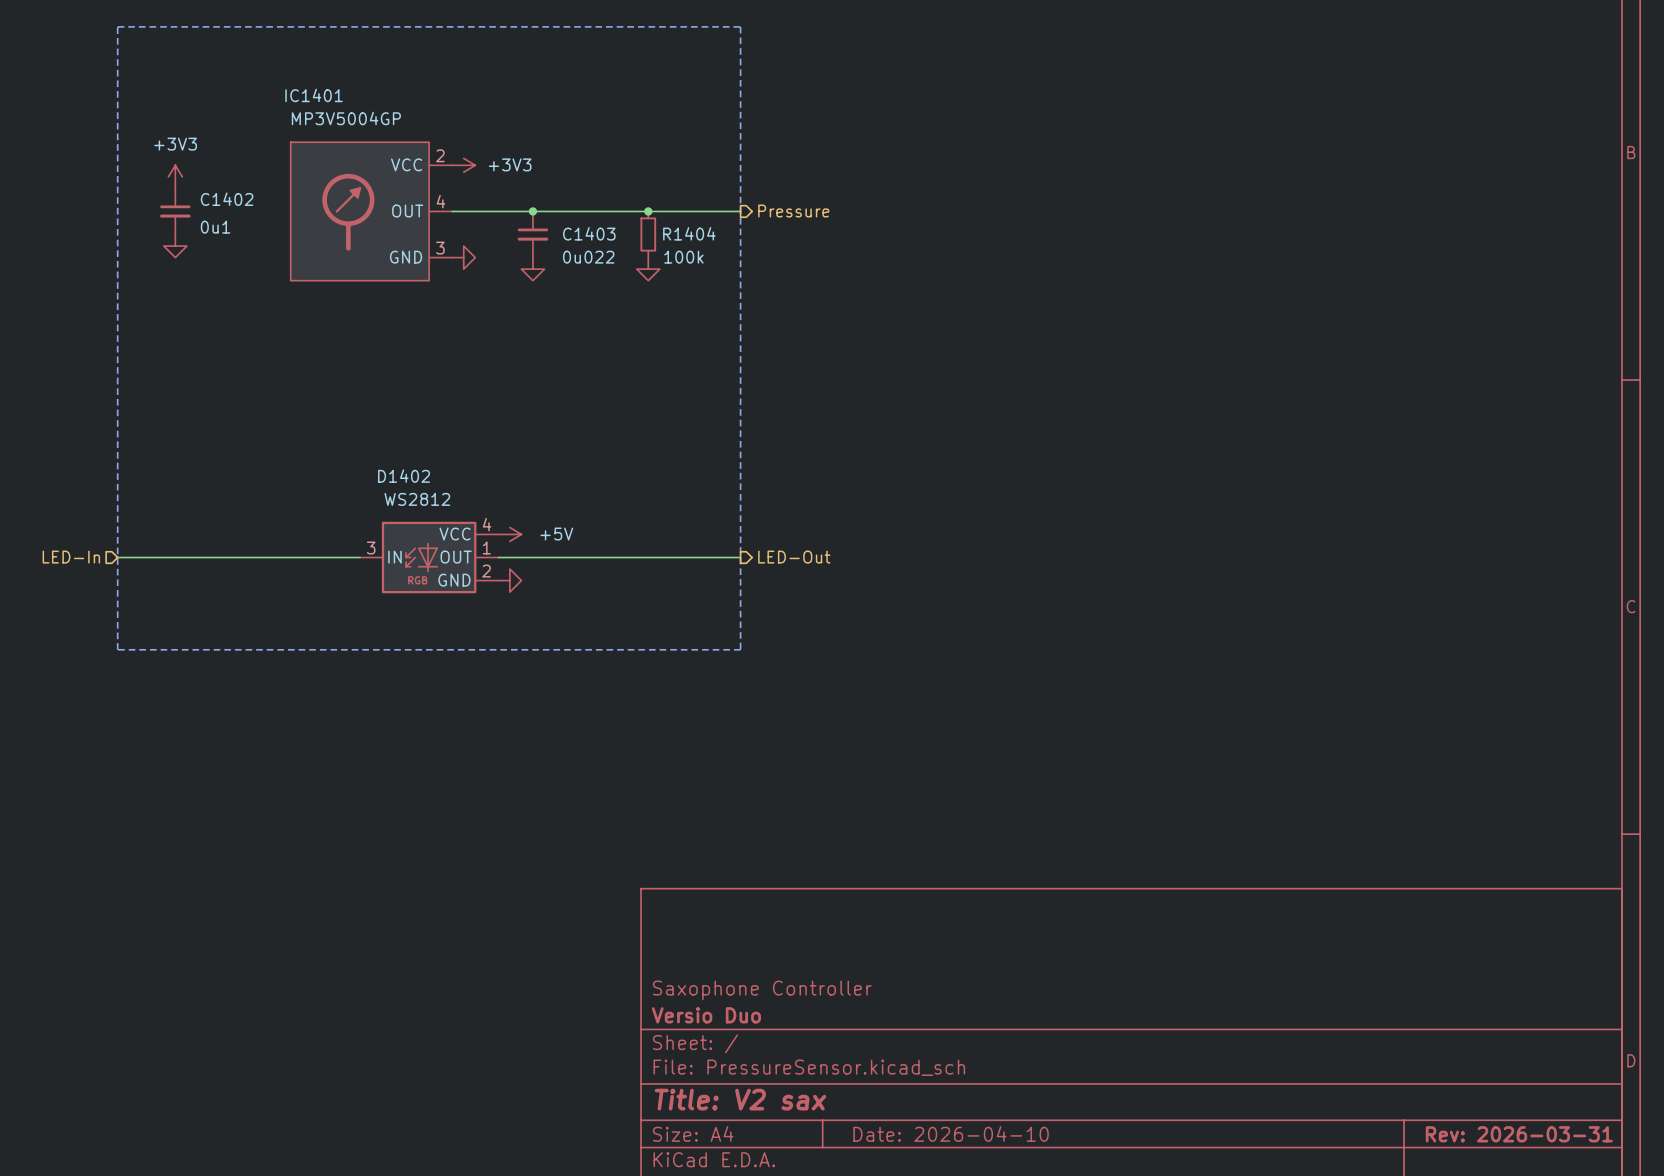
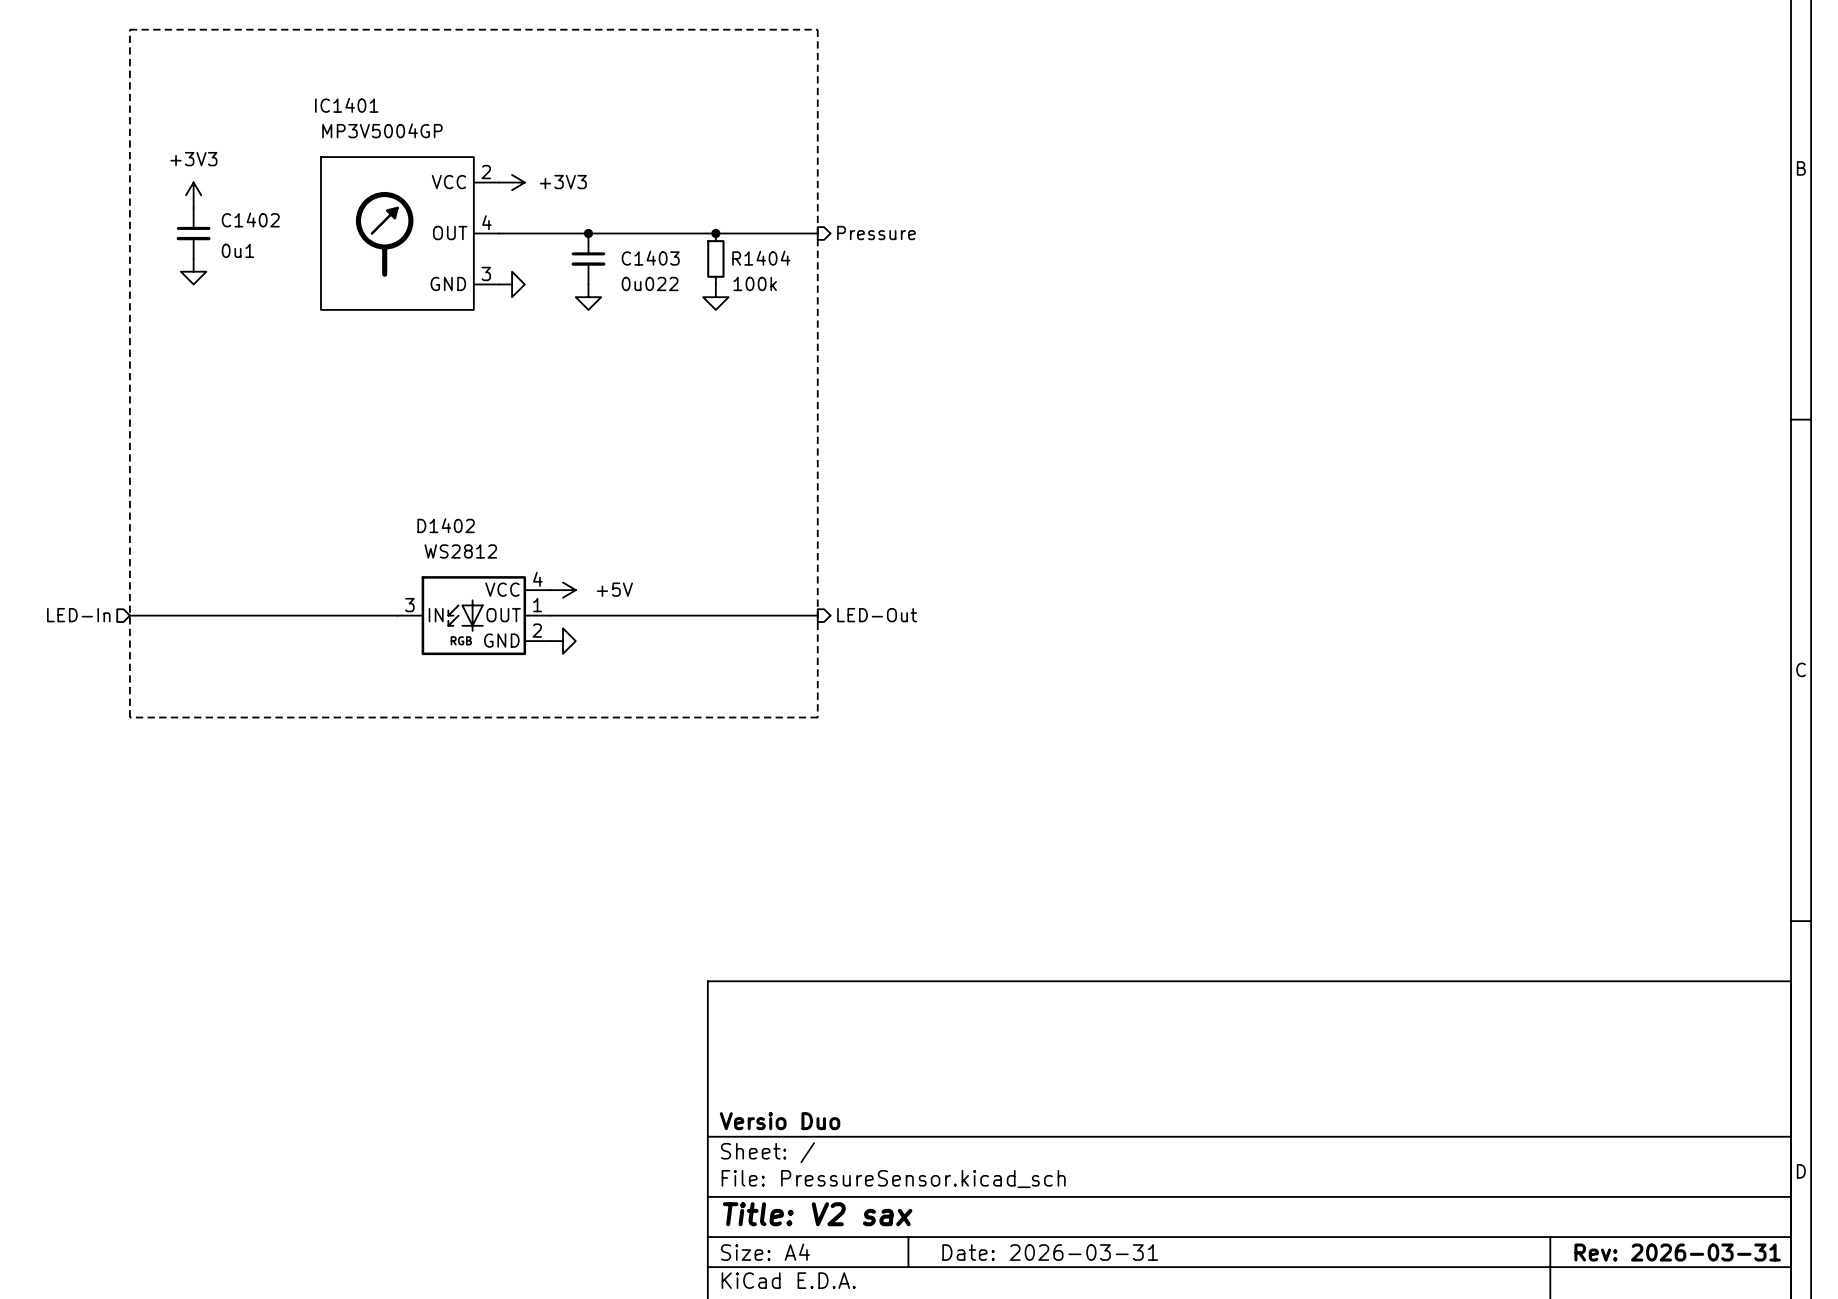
title block: Saxophone Controller (762, 990) -> none
title block: Date: 2026-04-10 (951, 1133) -> Date: 2026-03-31 (1050, 1252)

